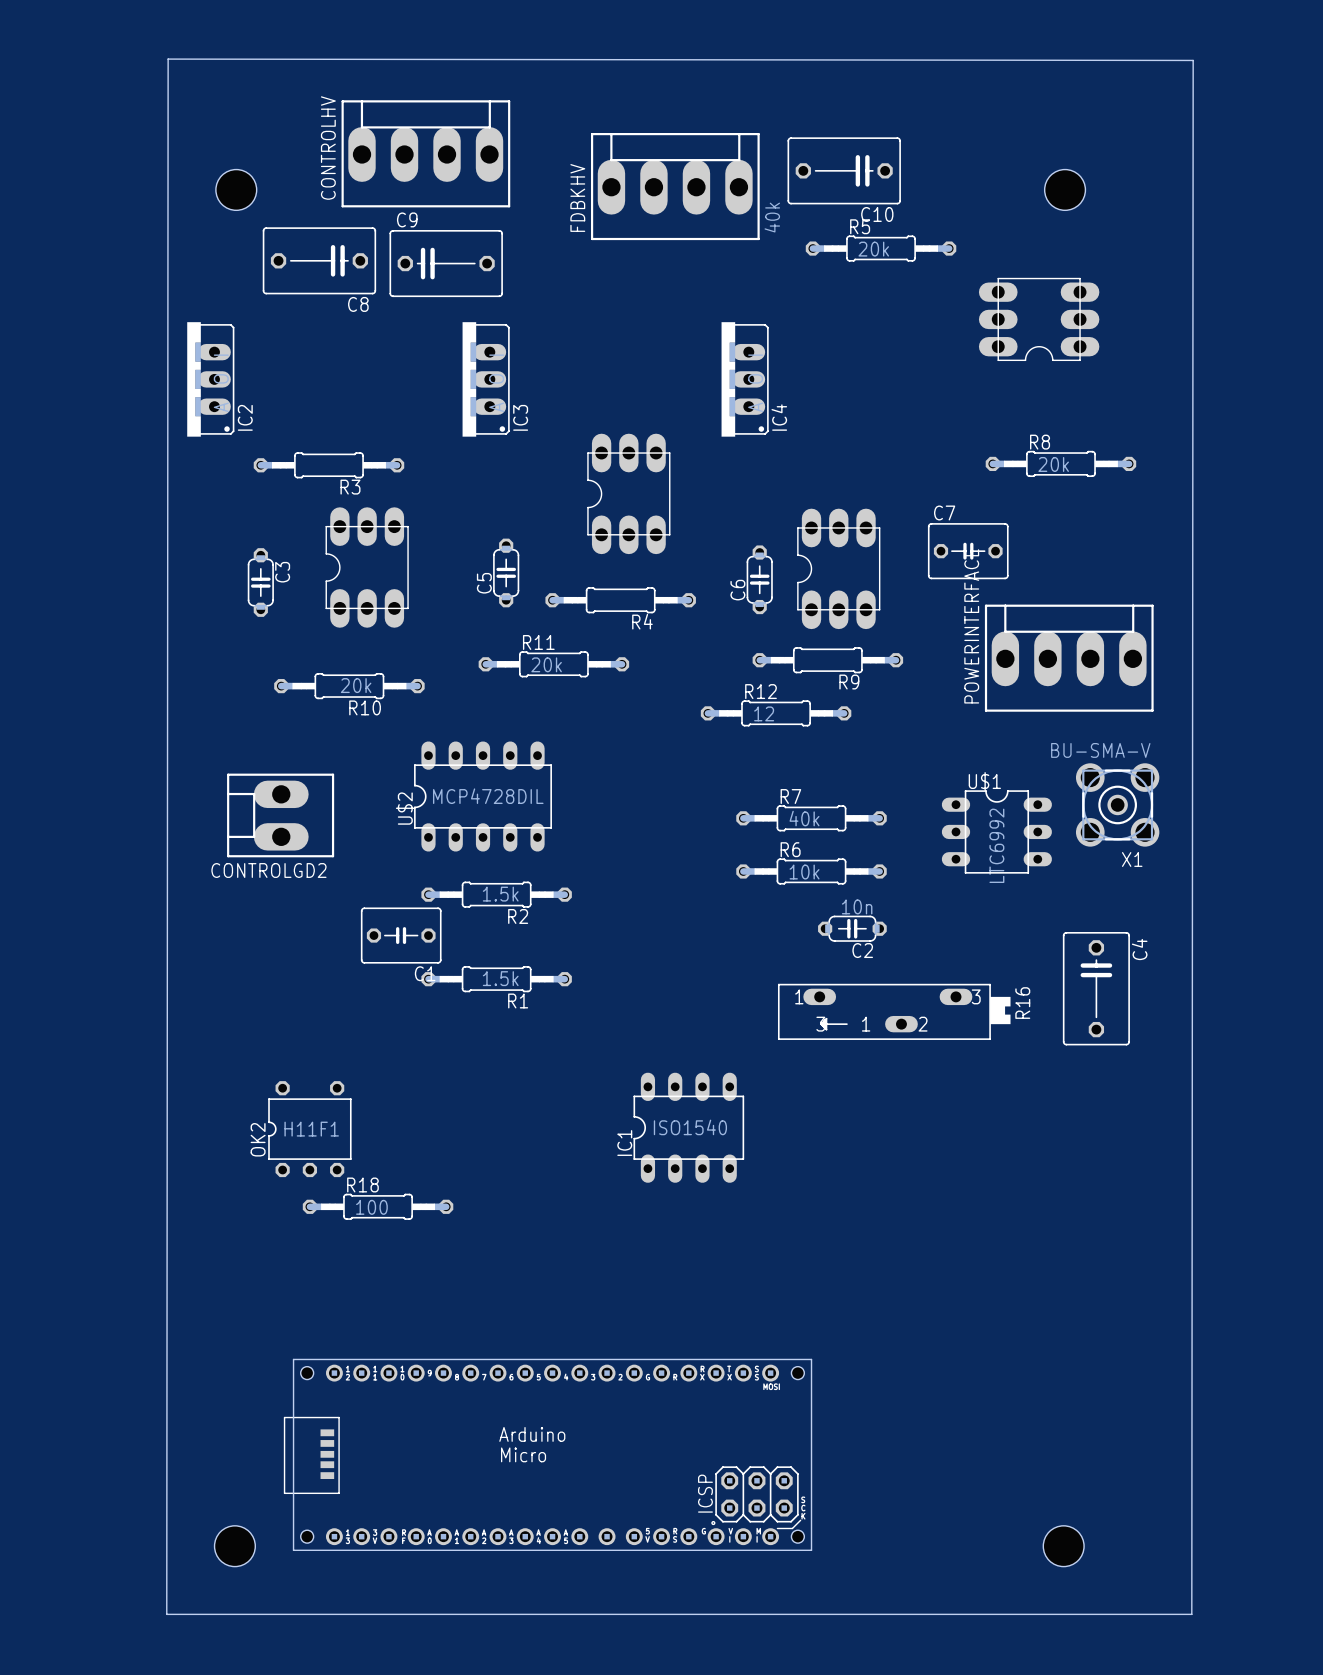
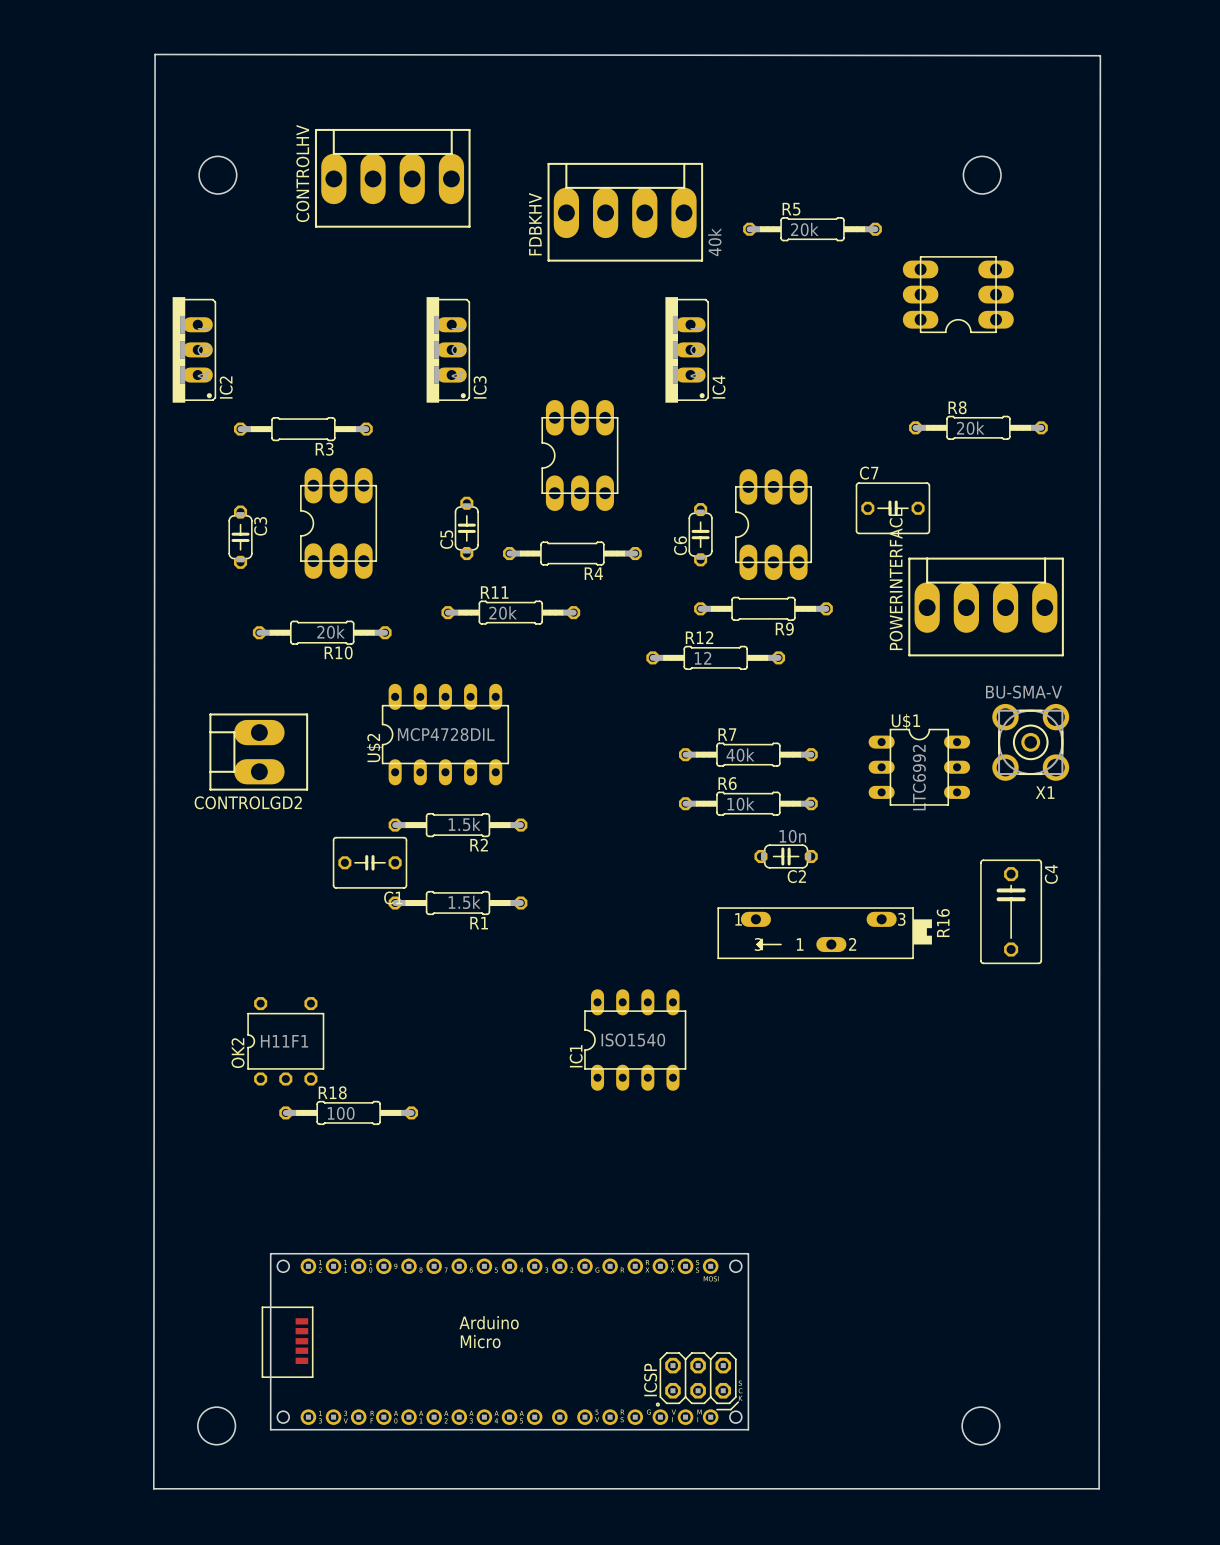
CONTROLHV position: (425, 153) -> (392, 178)
C10: (844, 170) -> none
FDBKHV position: (675, 186) -> (625, 212)
C8: (319, 260) -> none
C9: (446, 263) -> none

